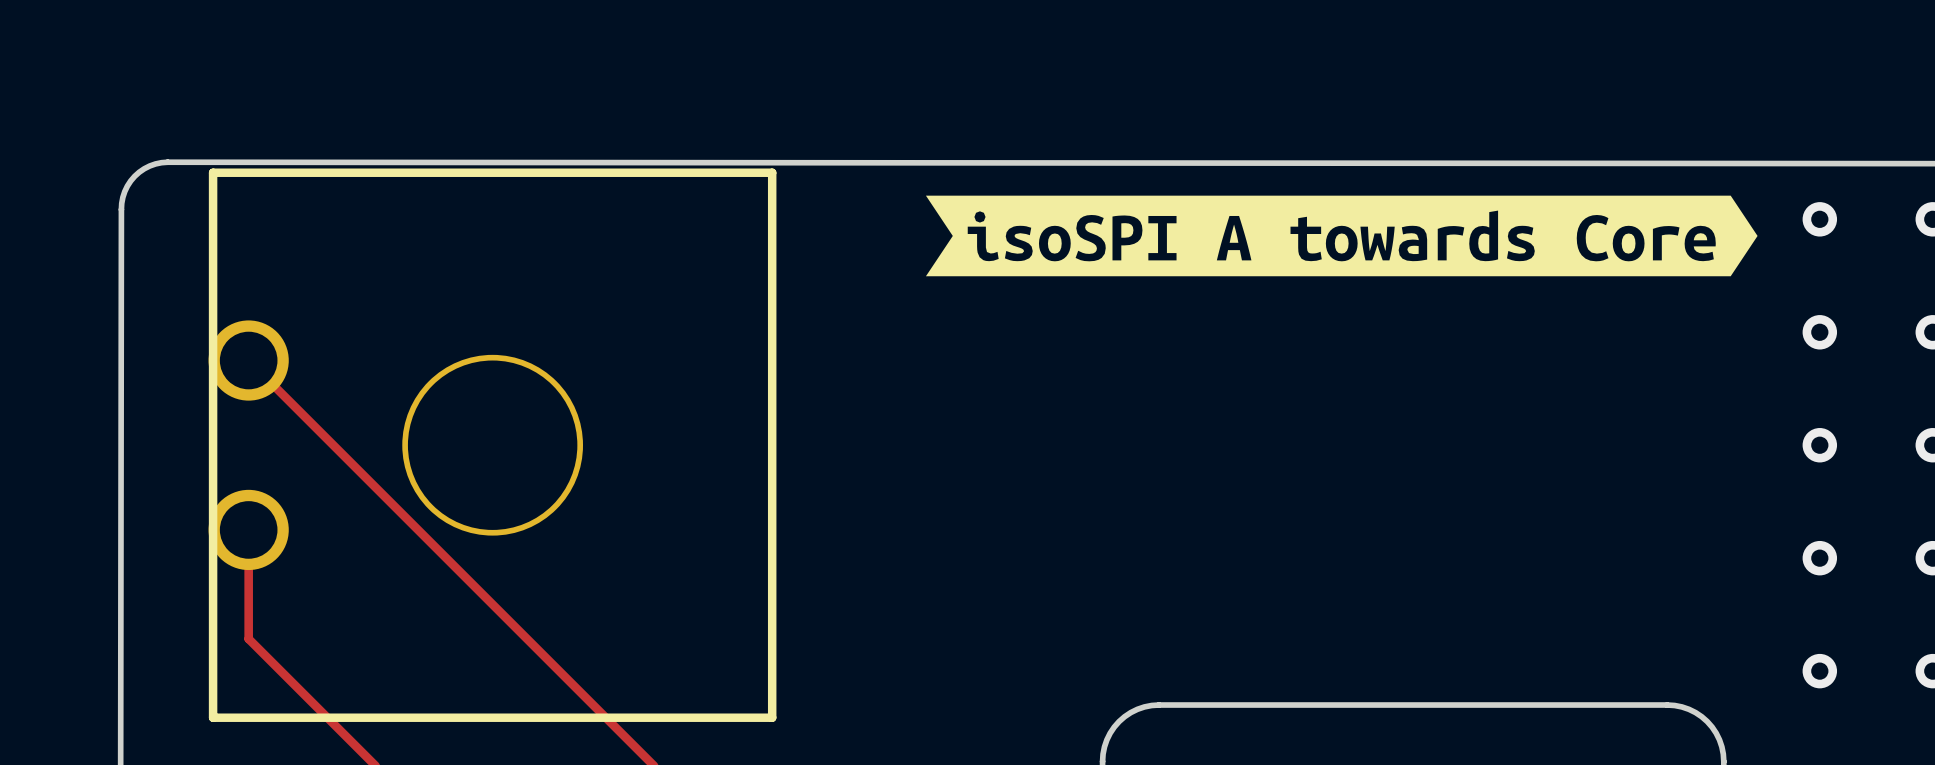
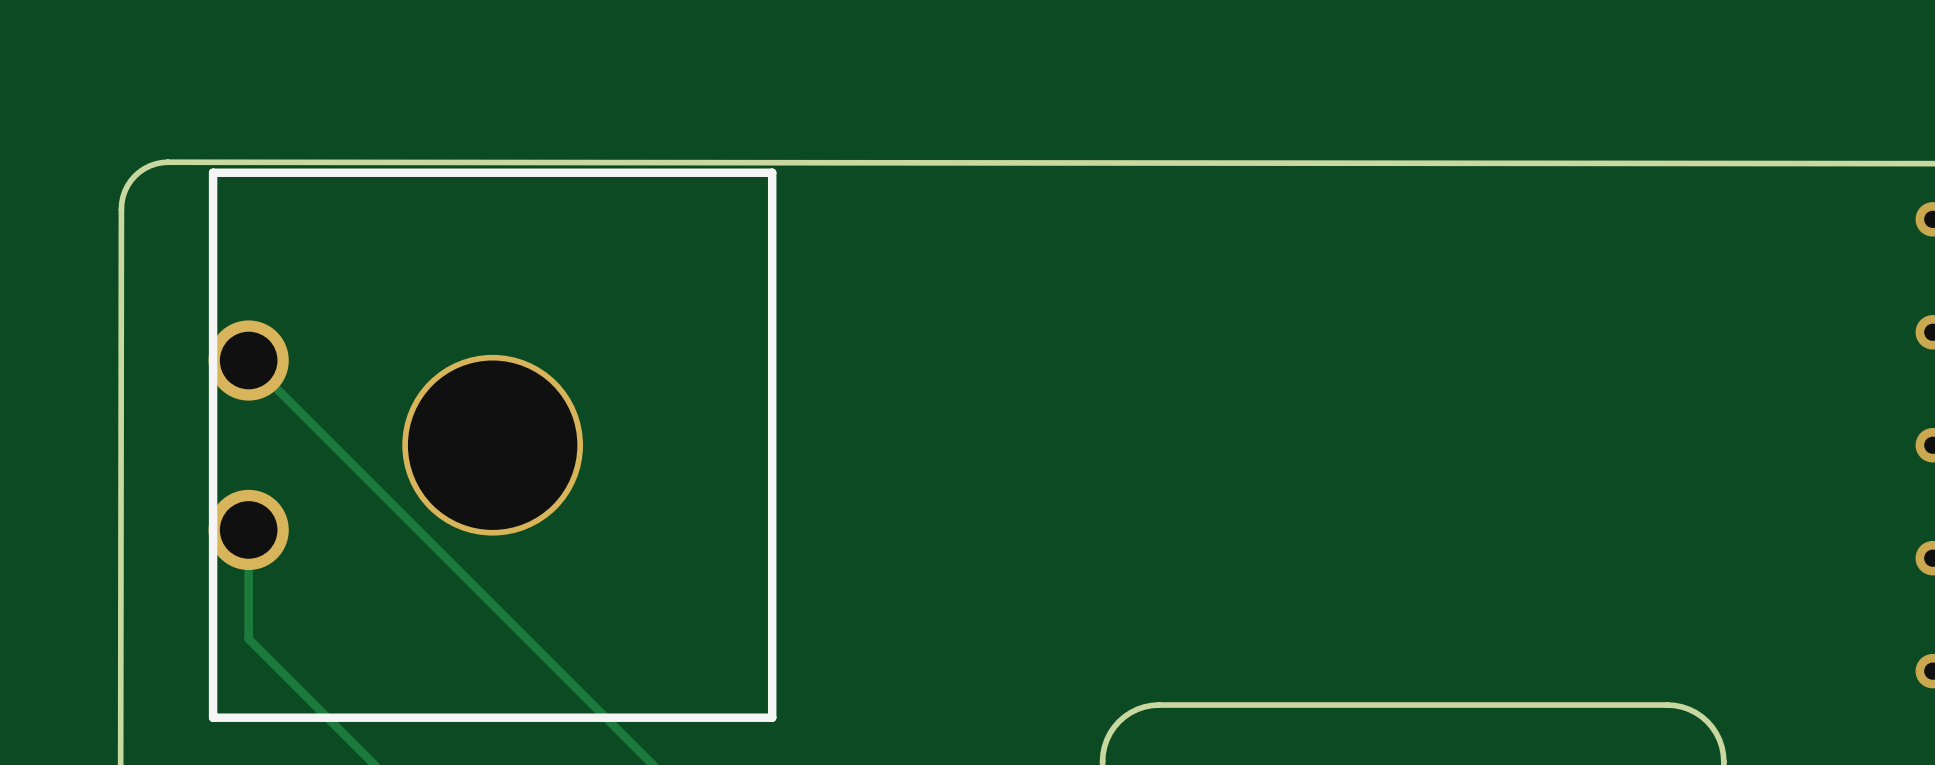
drawing: [925, 195, 1758, 277] -> none
via: (1819, 219) -> none
via: (1819, 332) -> none
via: (1819, 445) -> none
via: (1819, 558) -> none
via: (1819, 671) -> none

